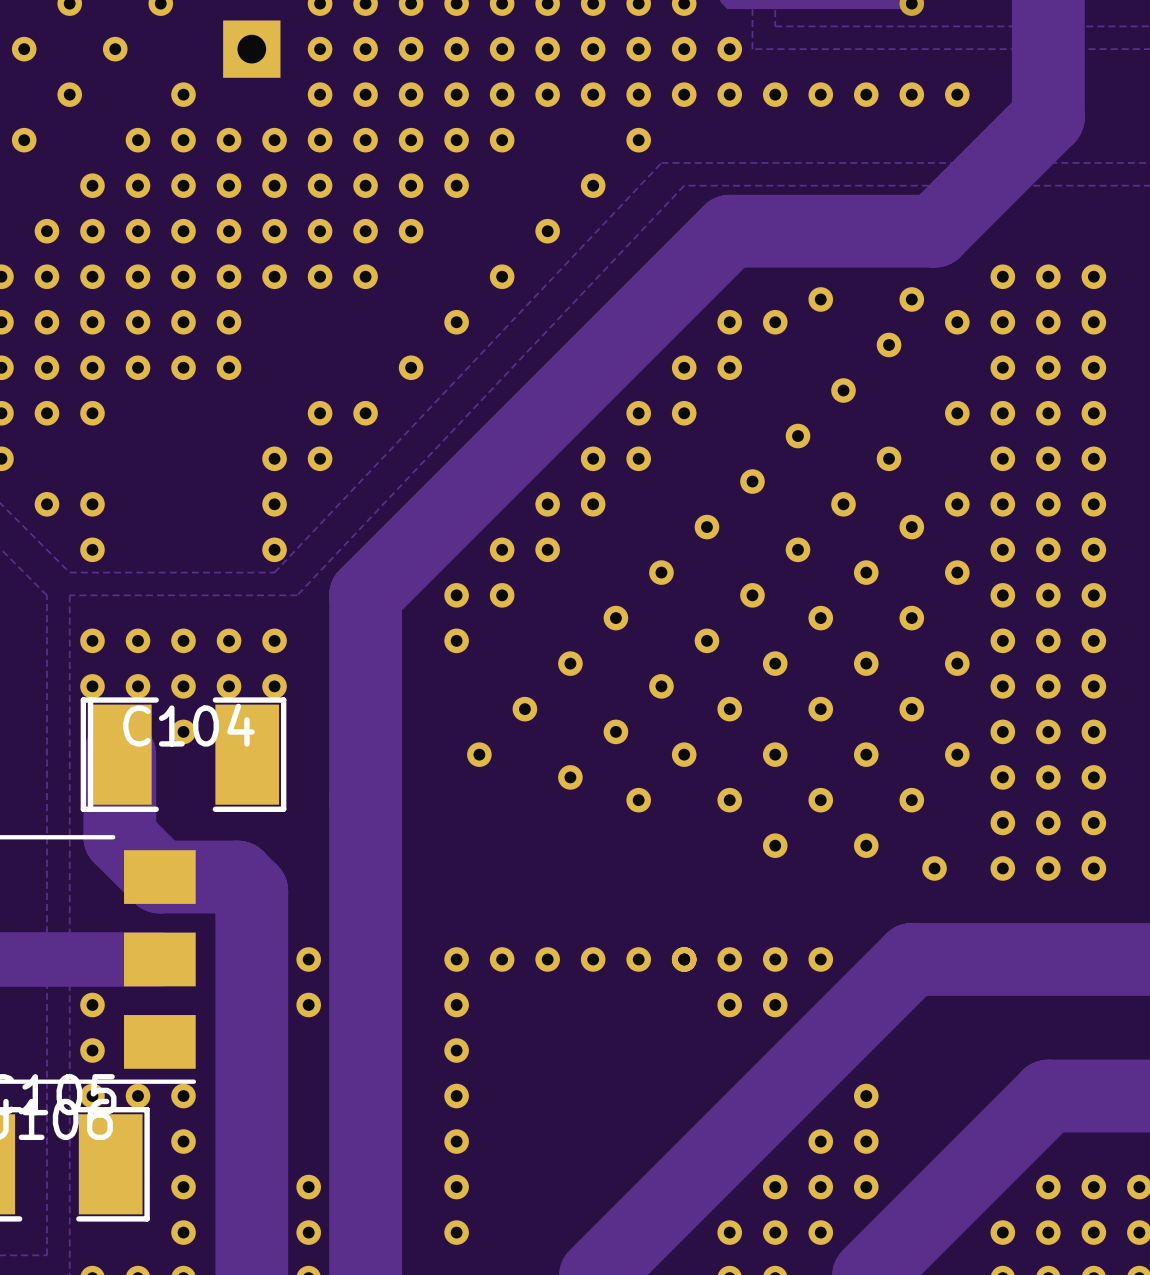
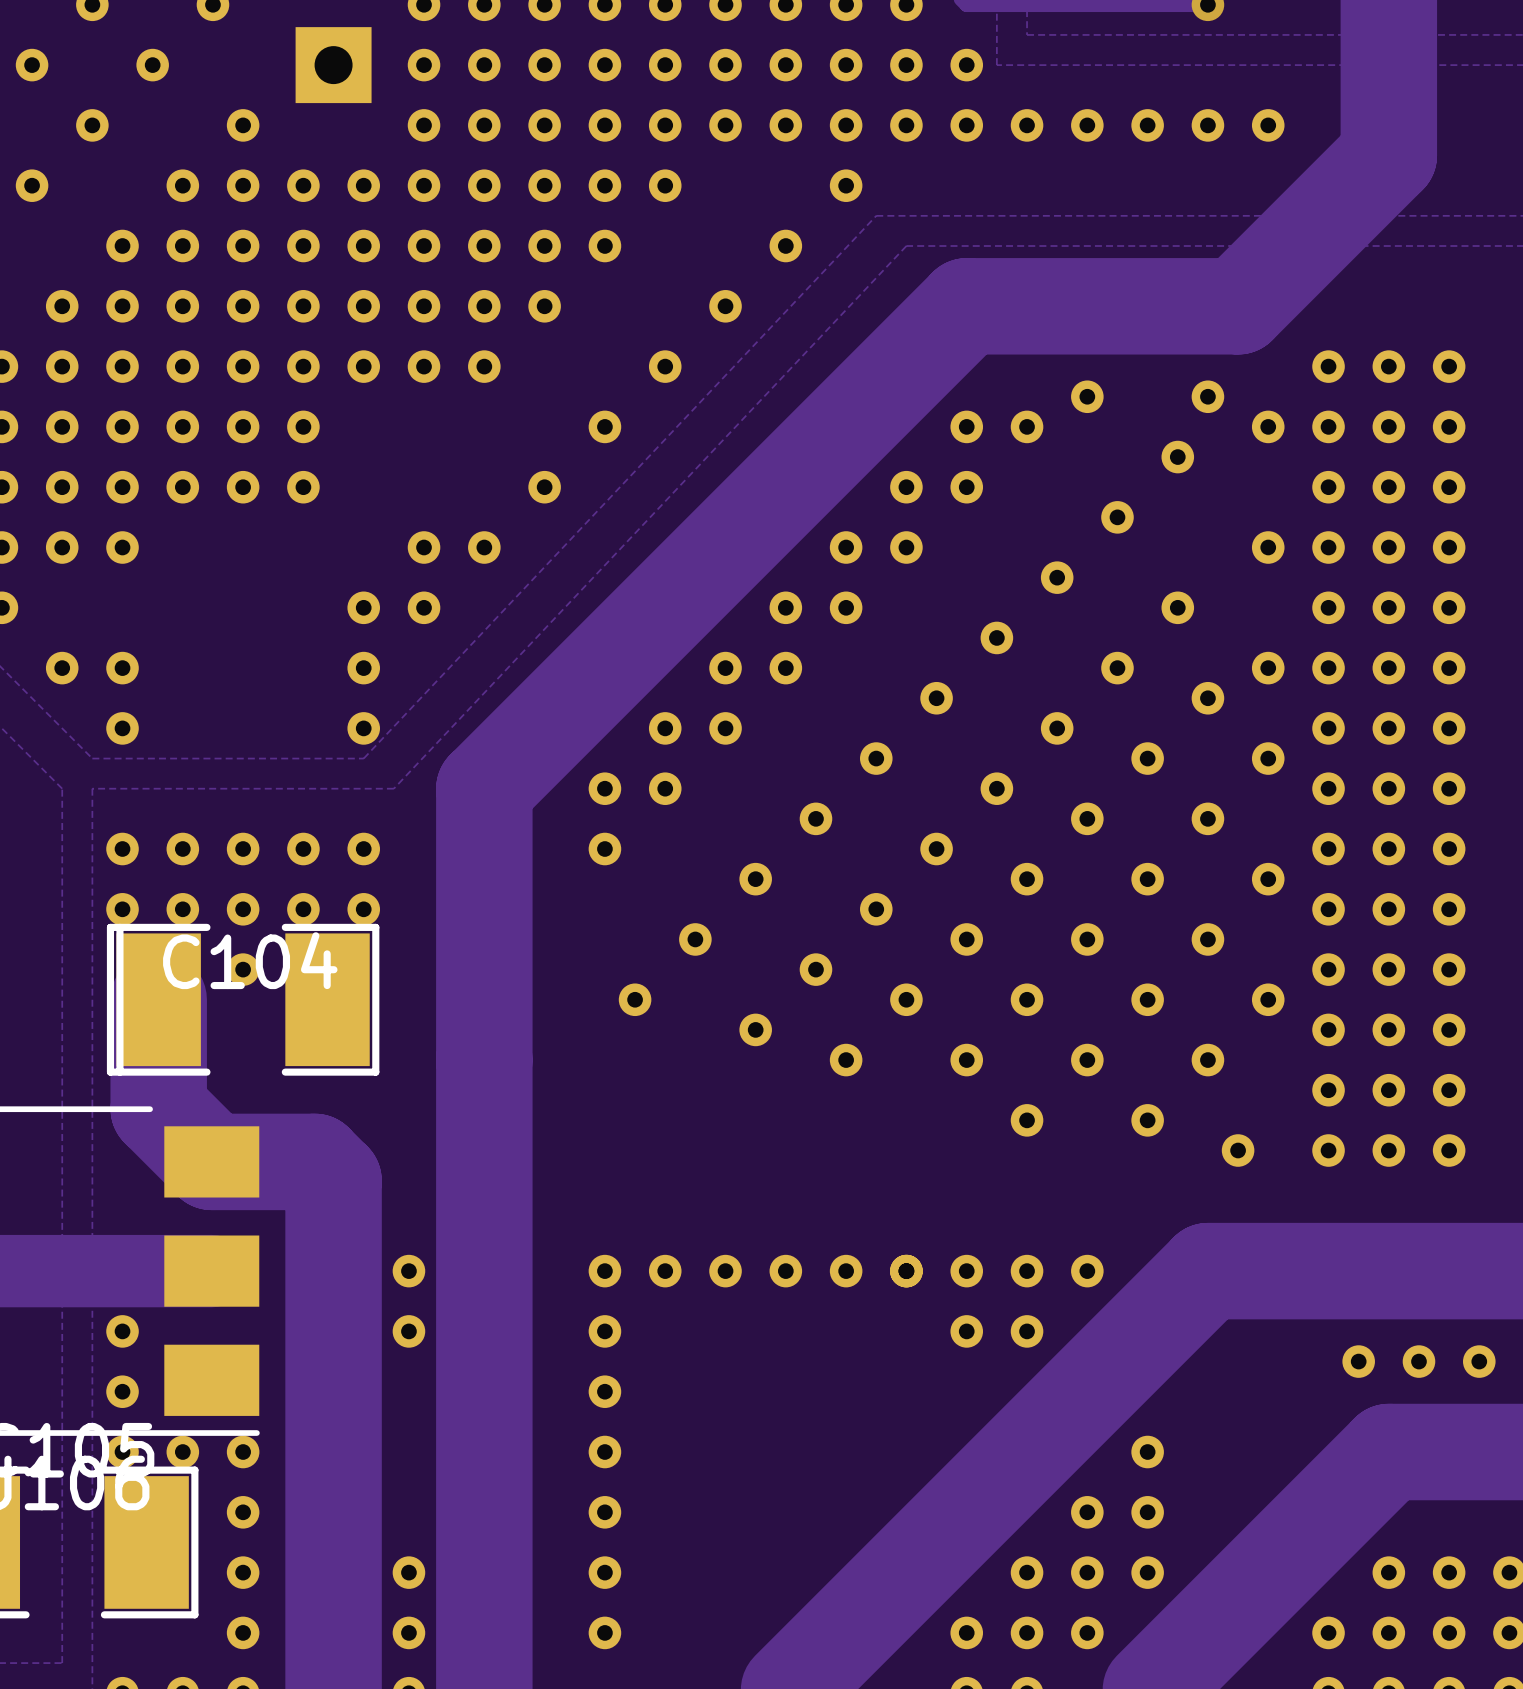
part: none -> (1358, 1361)
part: none -> (1418, 1361)
part: none -> (1479, 1361)

